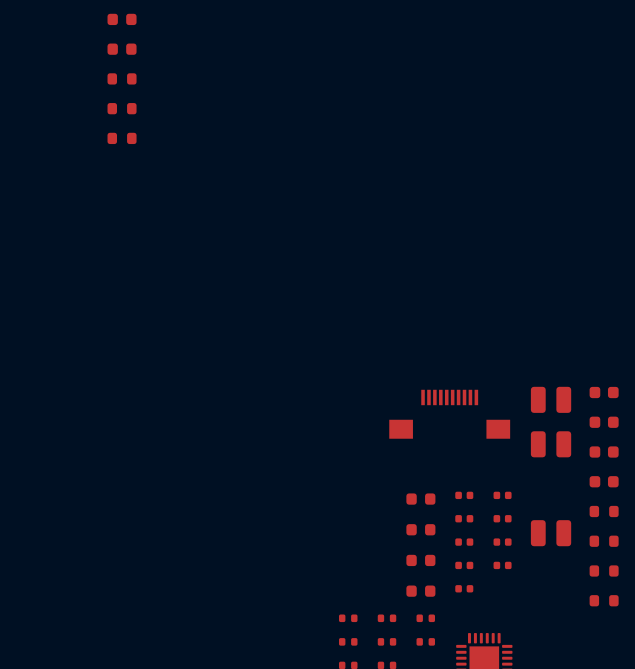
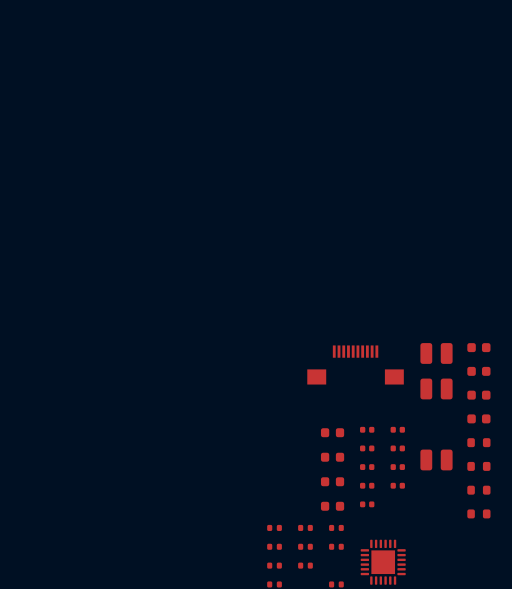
part: (122, 19) -> none
part: (122, 49) -> none
part: (122, 78) -> none
part: (122, 108) -> none
part: (122, 138) -> none

